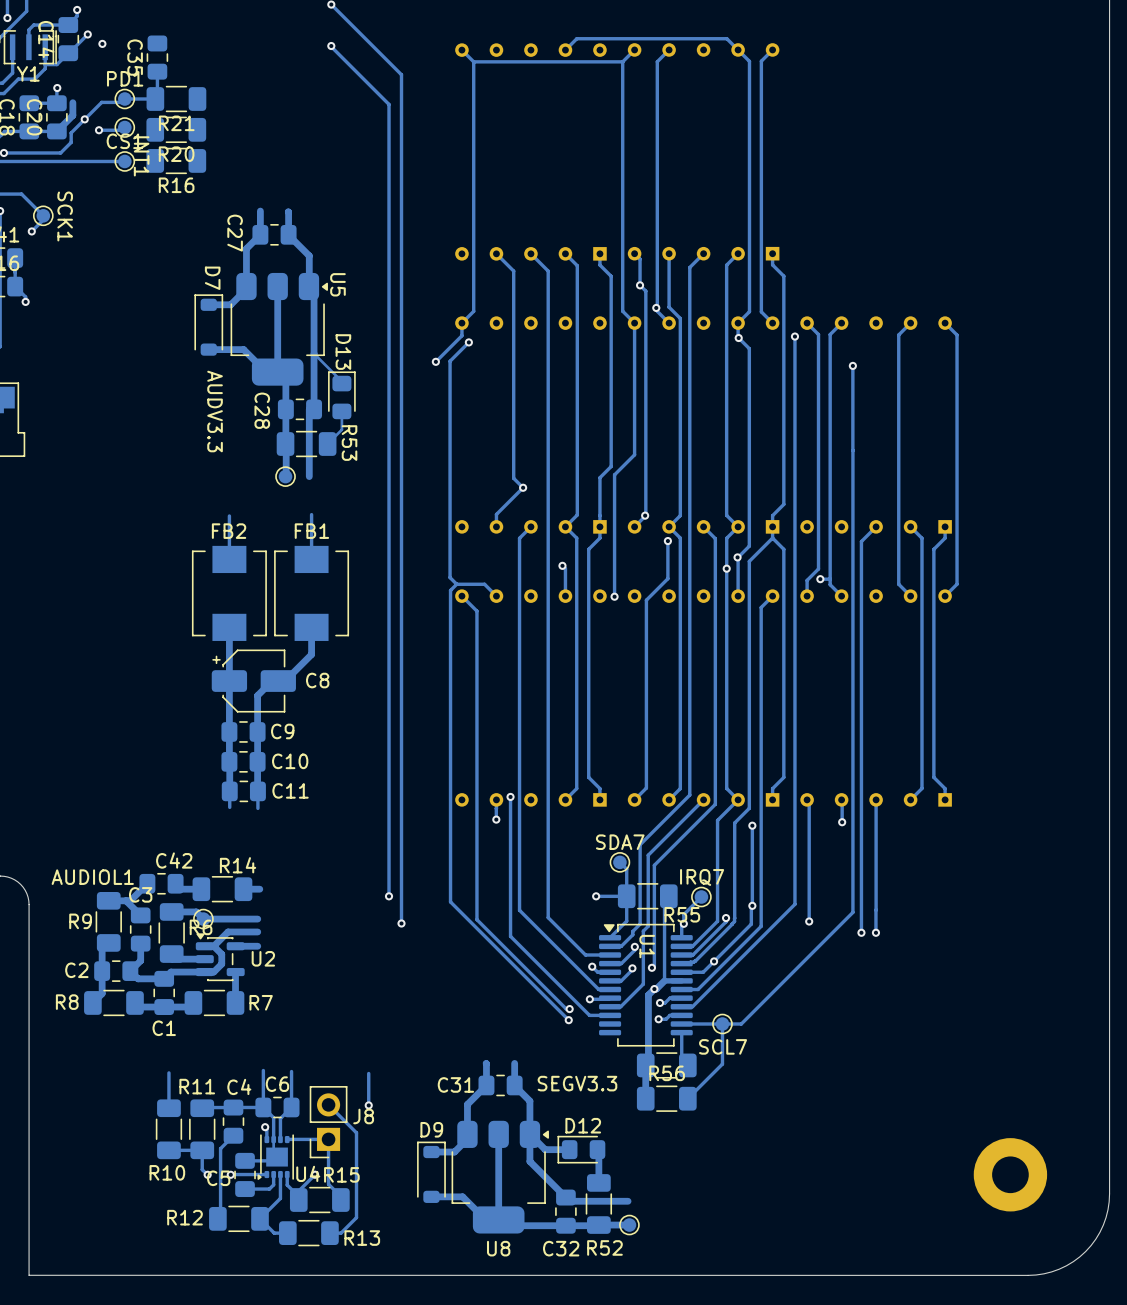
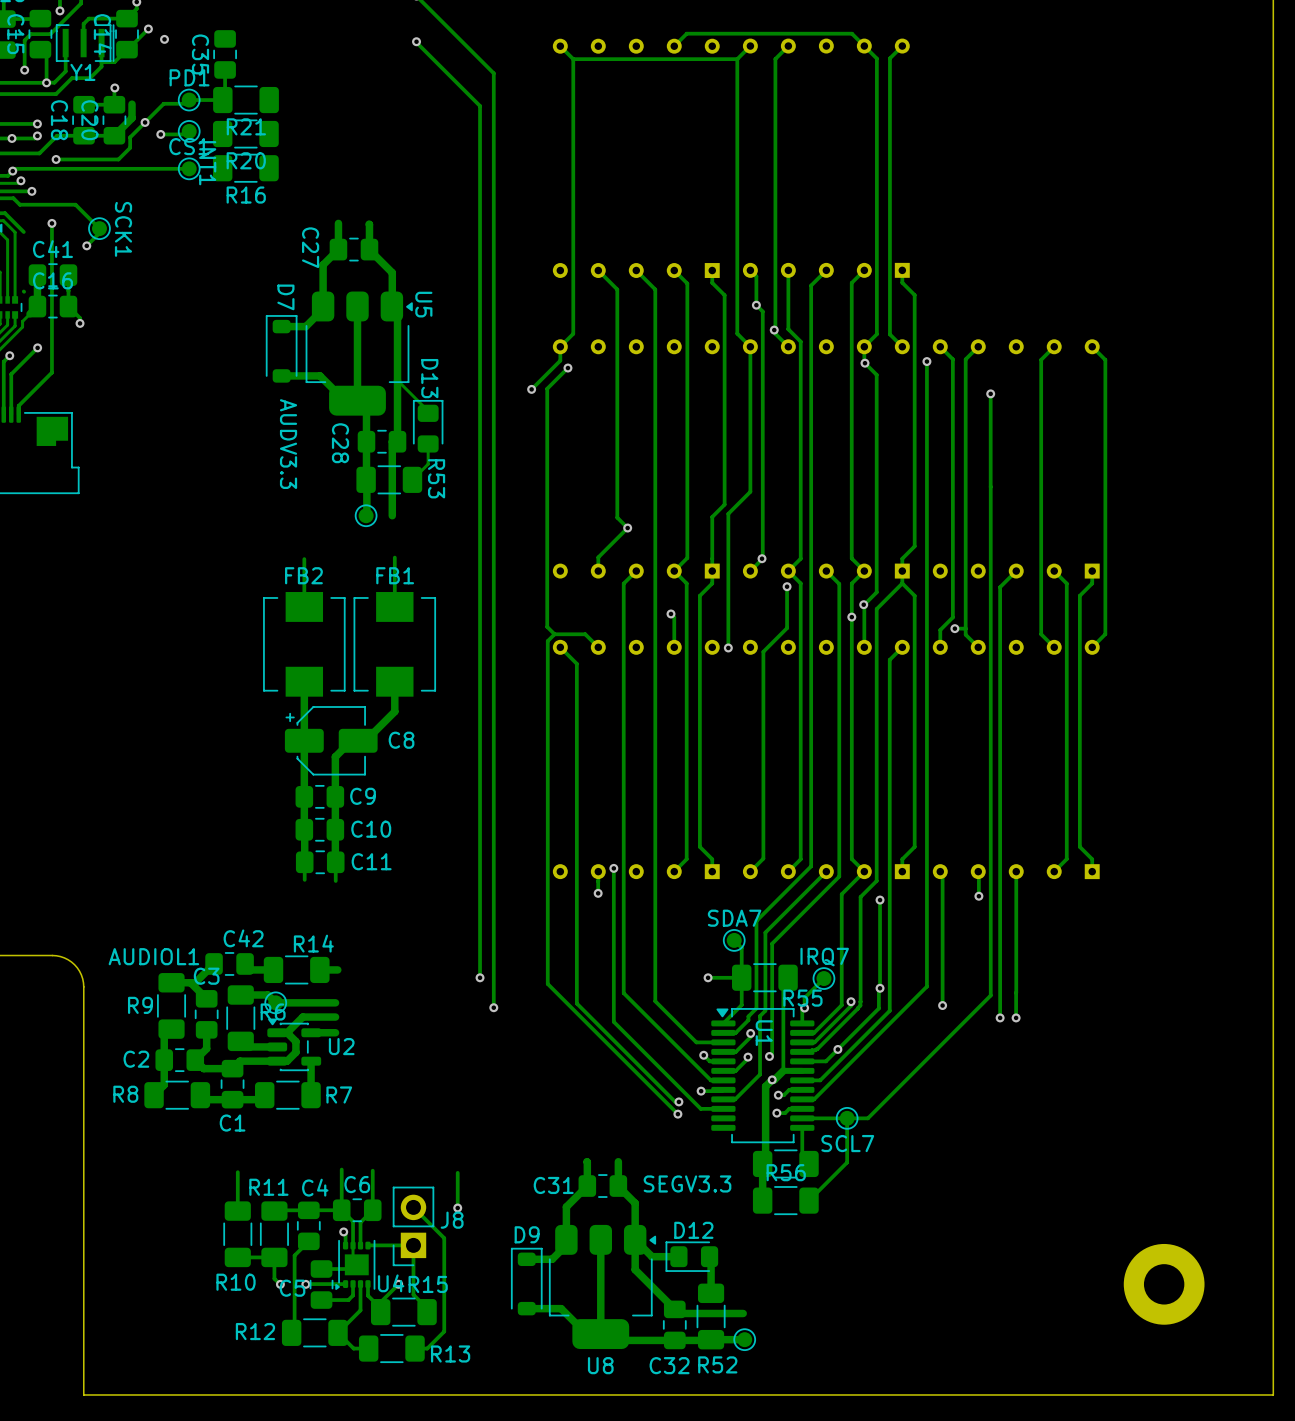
board edge: (1109, 1193) (1107, 1209) (1103, 1225) (1095, 1239) (1085, 1251) (1066, 1265) (1051, 1271) (1036, 1275) (29, 1275) -> (1273, 1305) (1273, 1394) (83, 1394)

